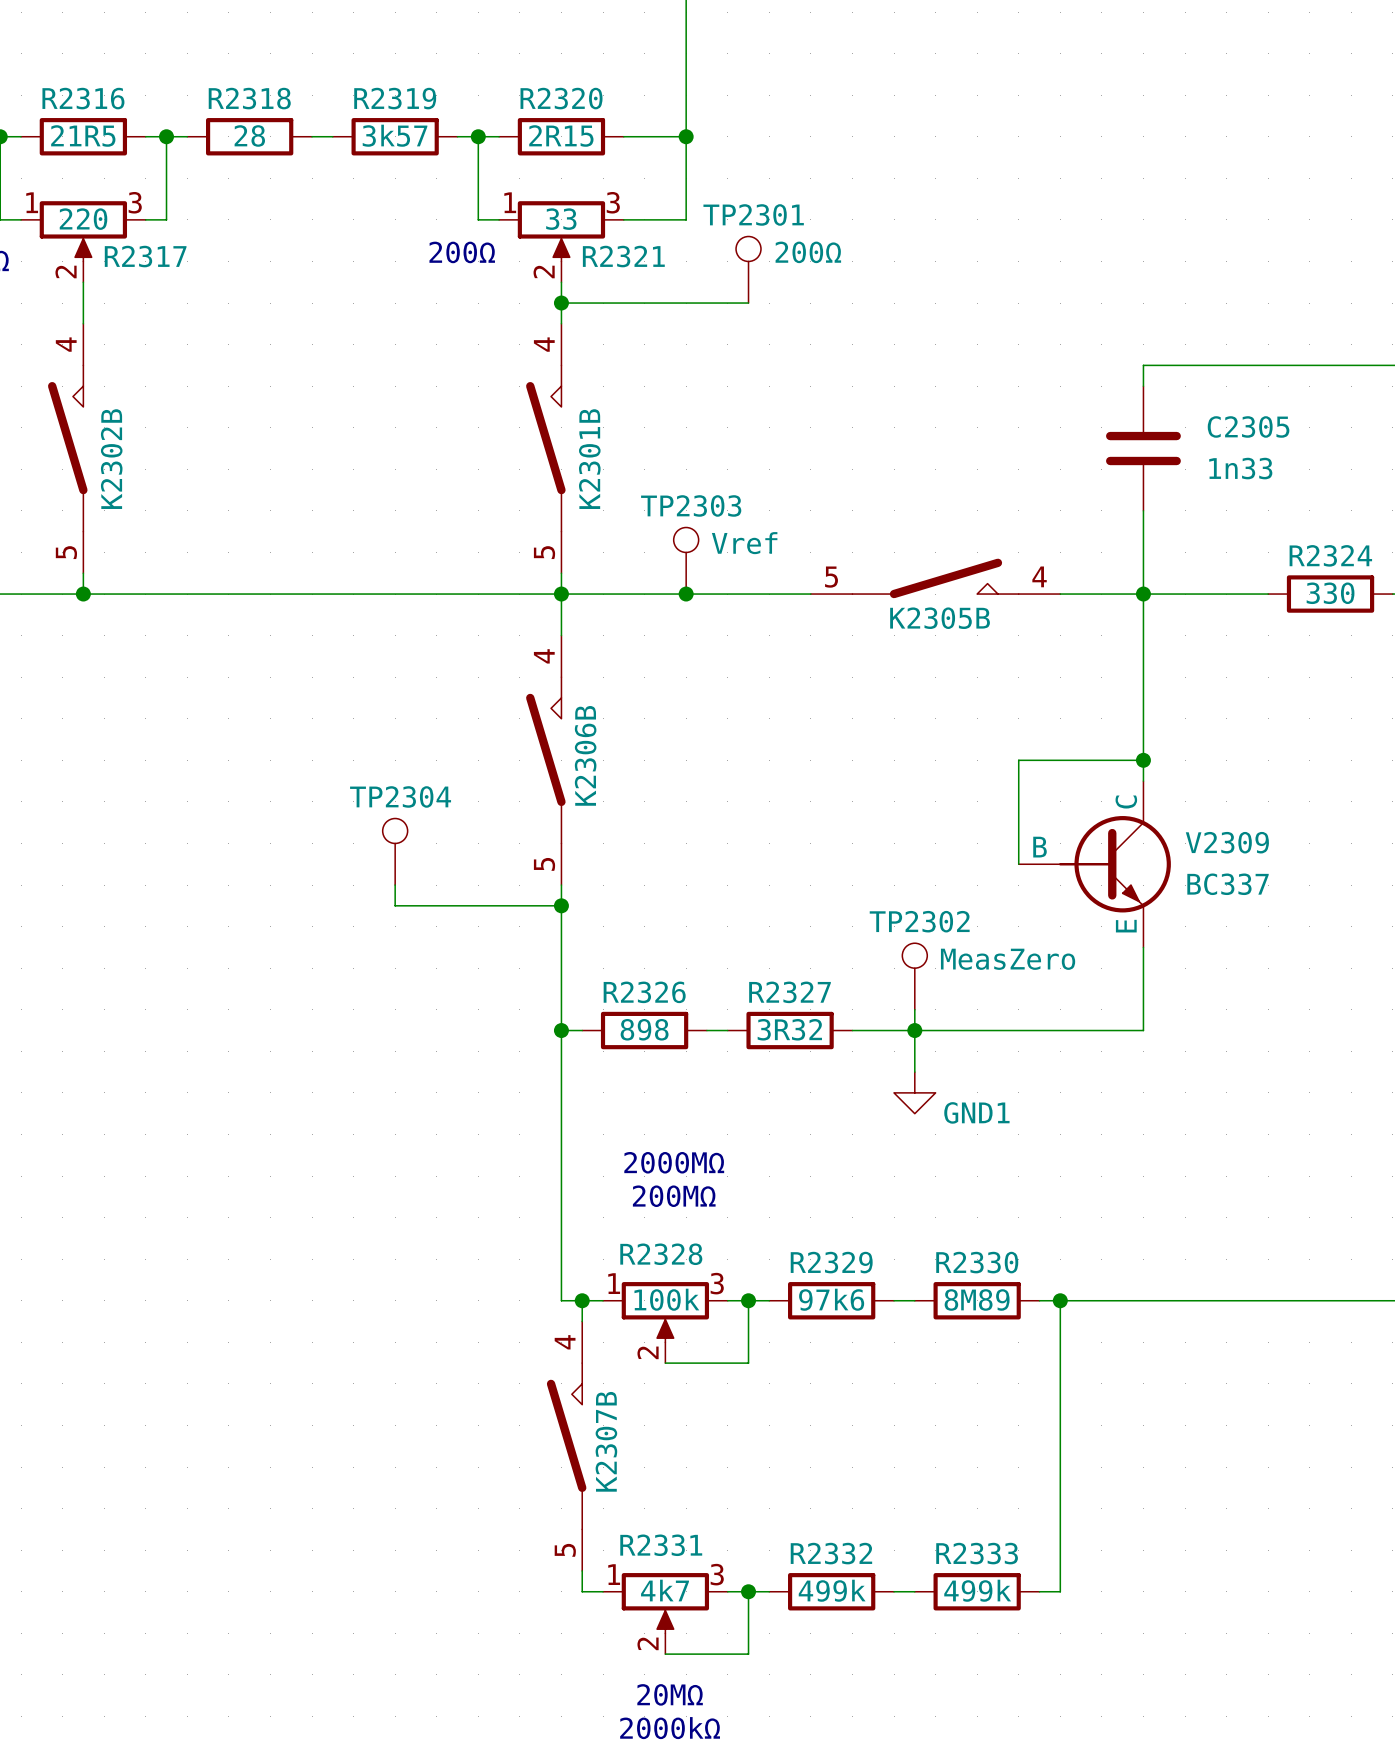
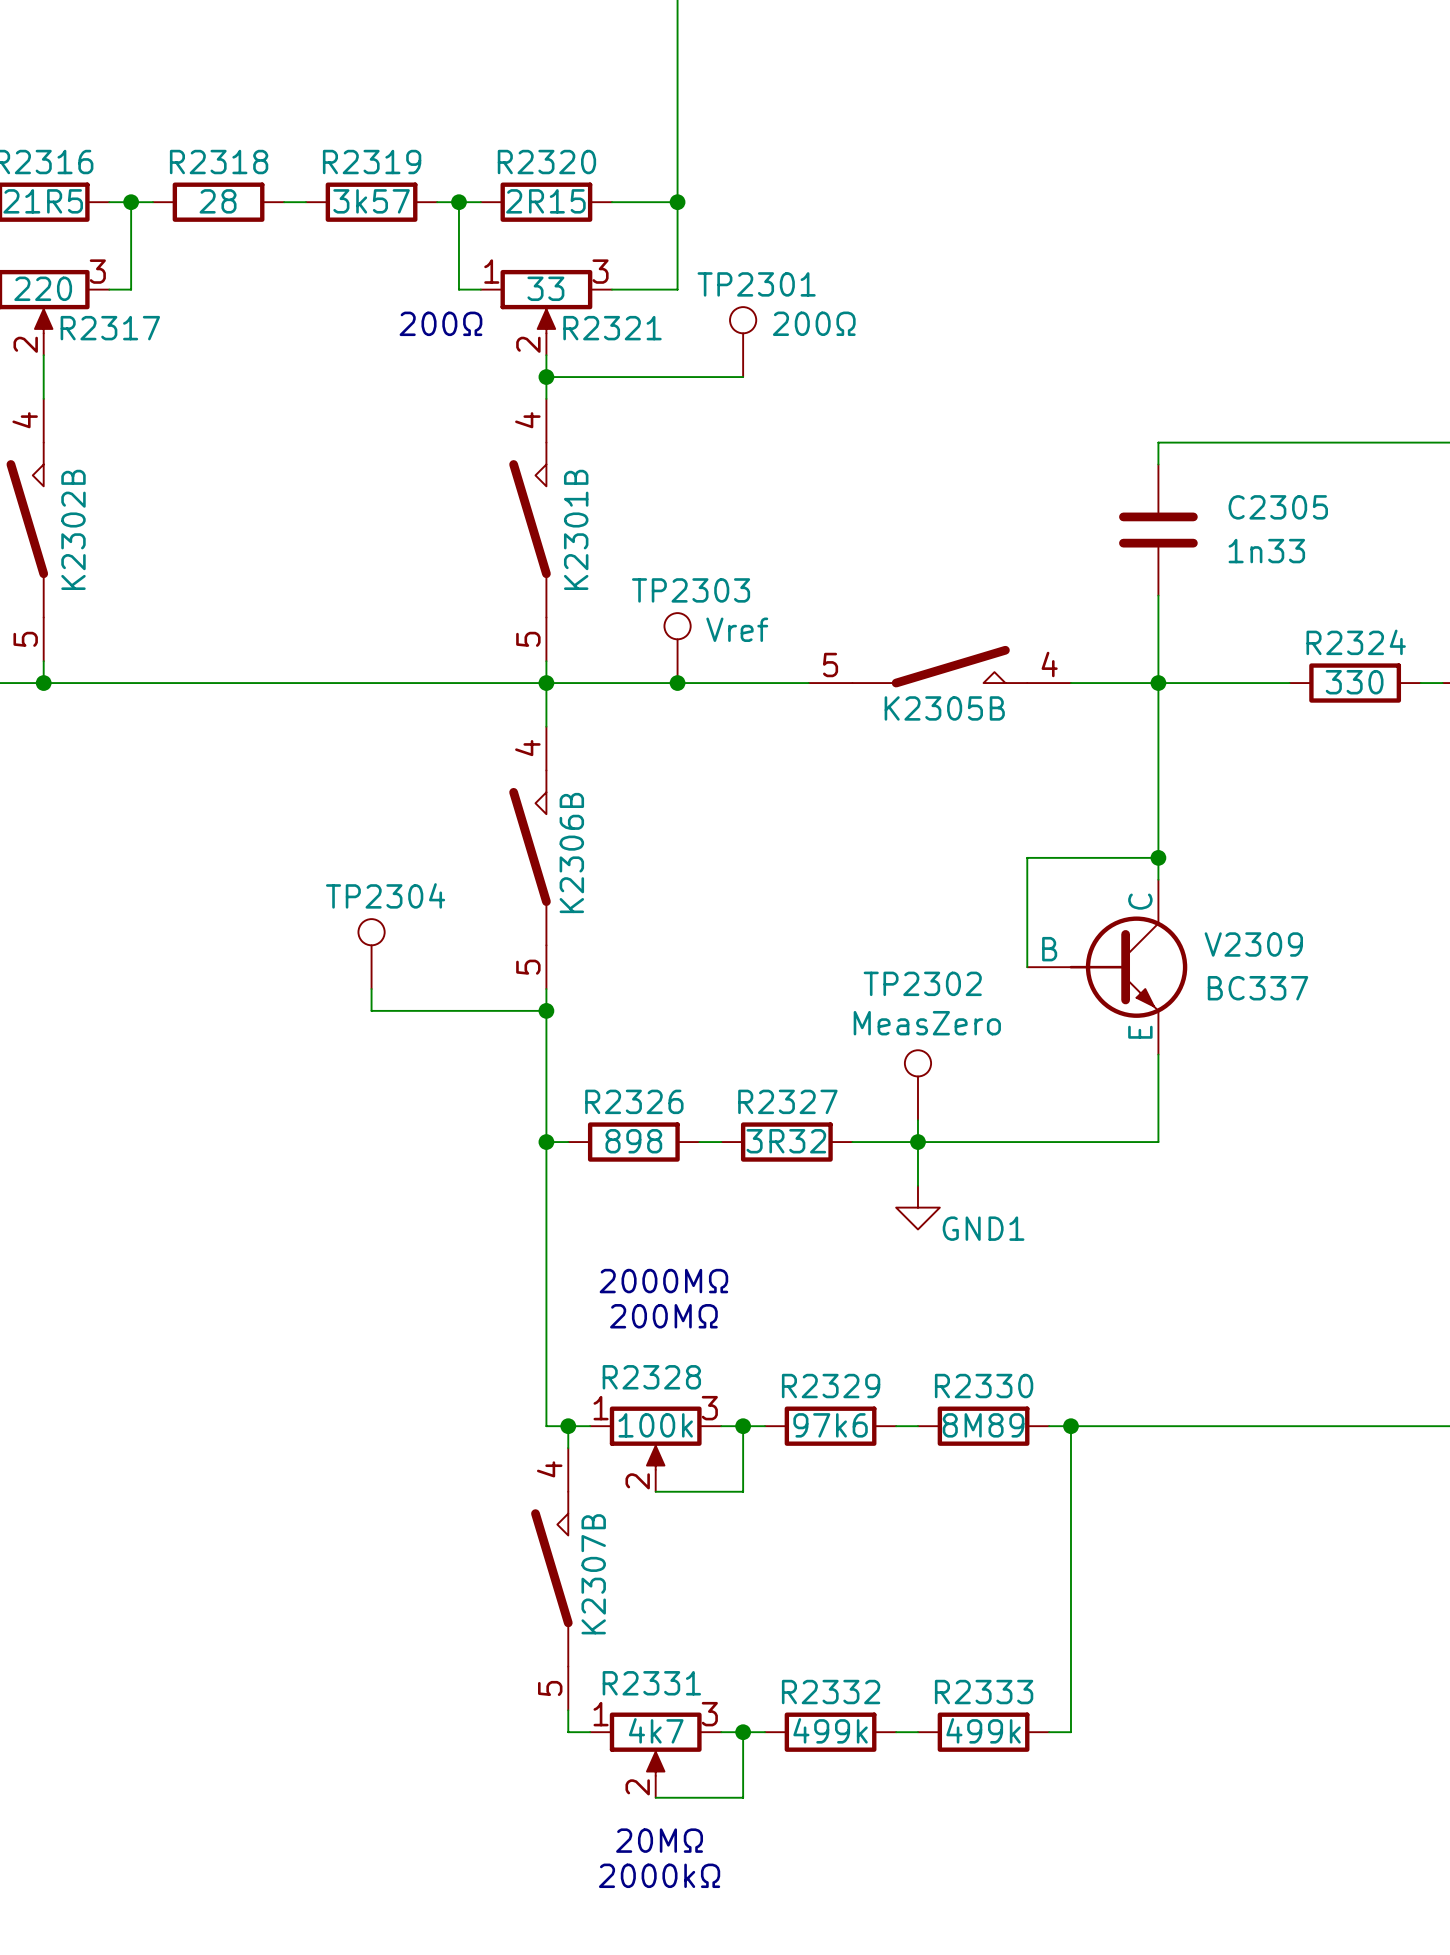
TP2302 name position: TP2302 (919, 921) -> TP2302 (922, 983)
TP2302 value position: MeasZero (1008, 959) -> MeasZero (927, 1023)

